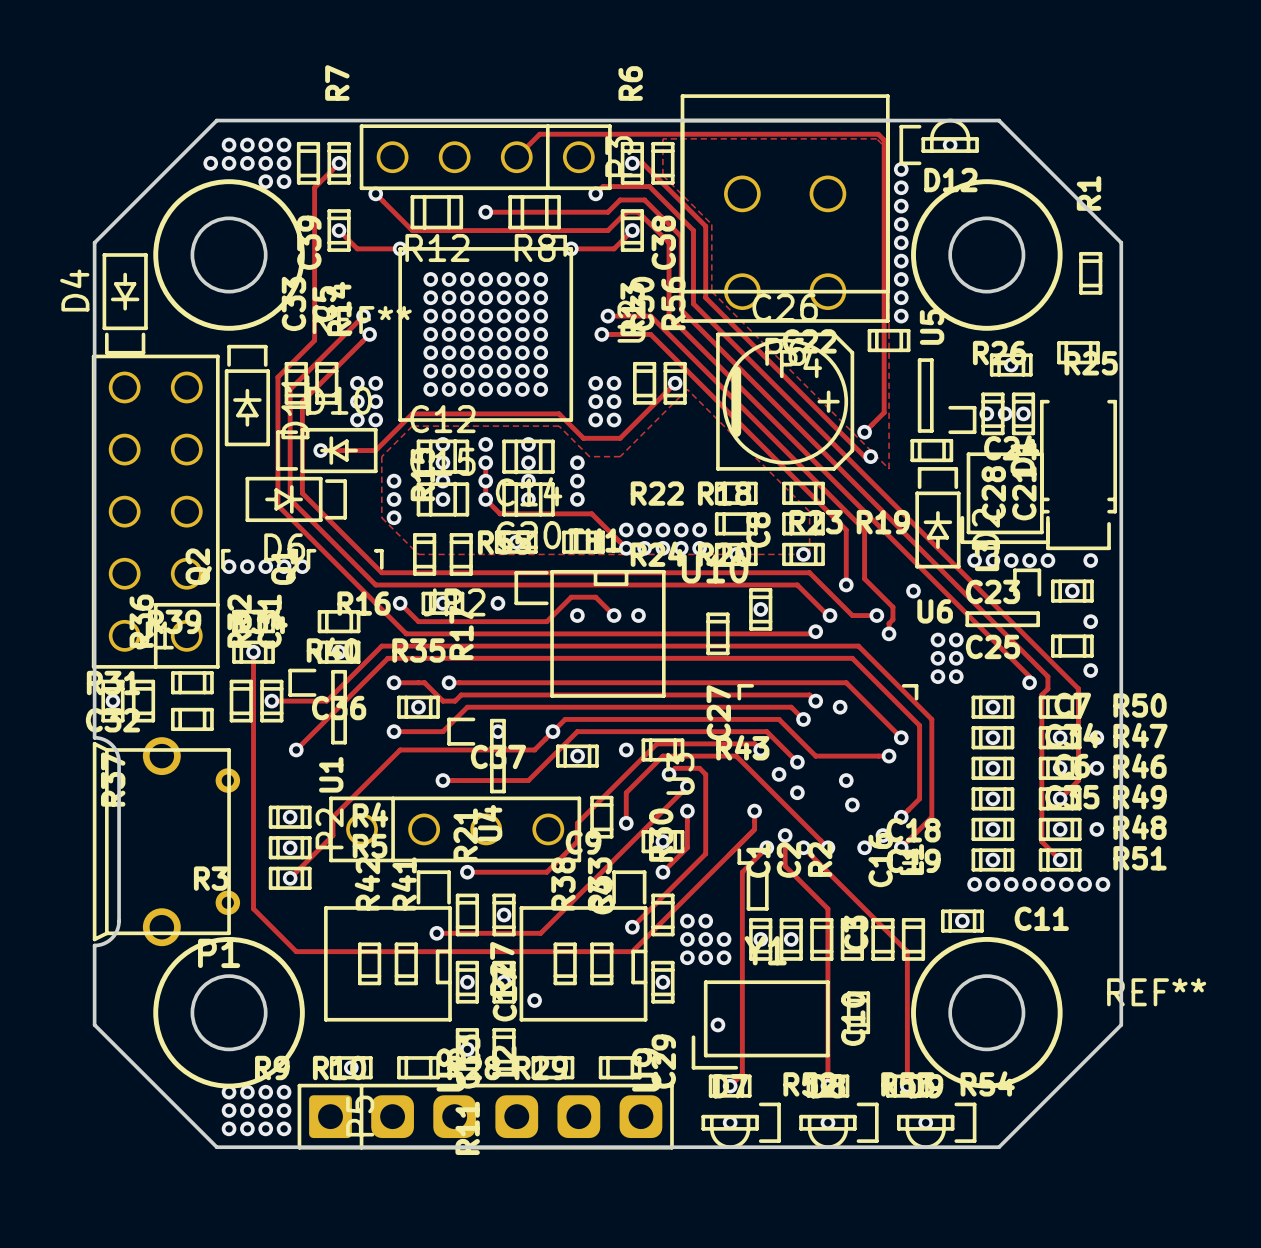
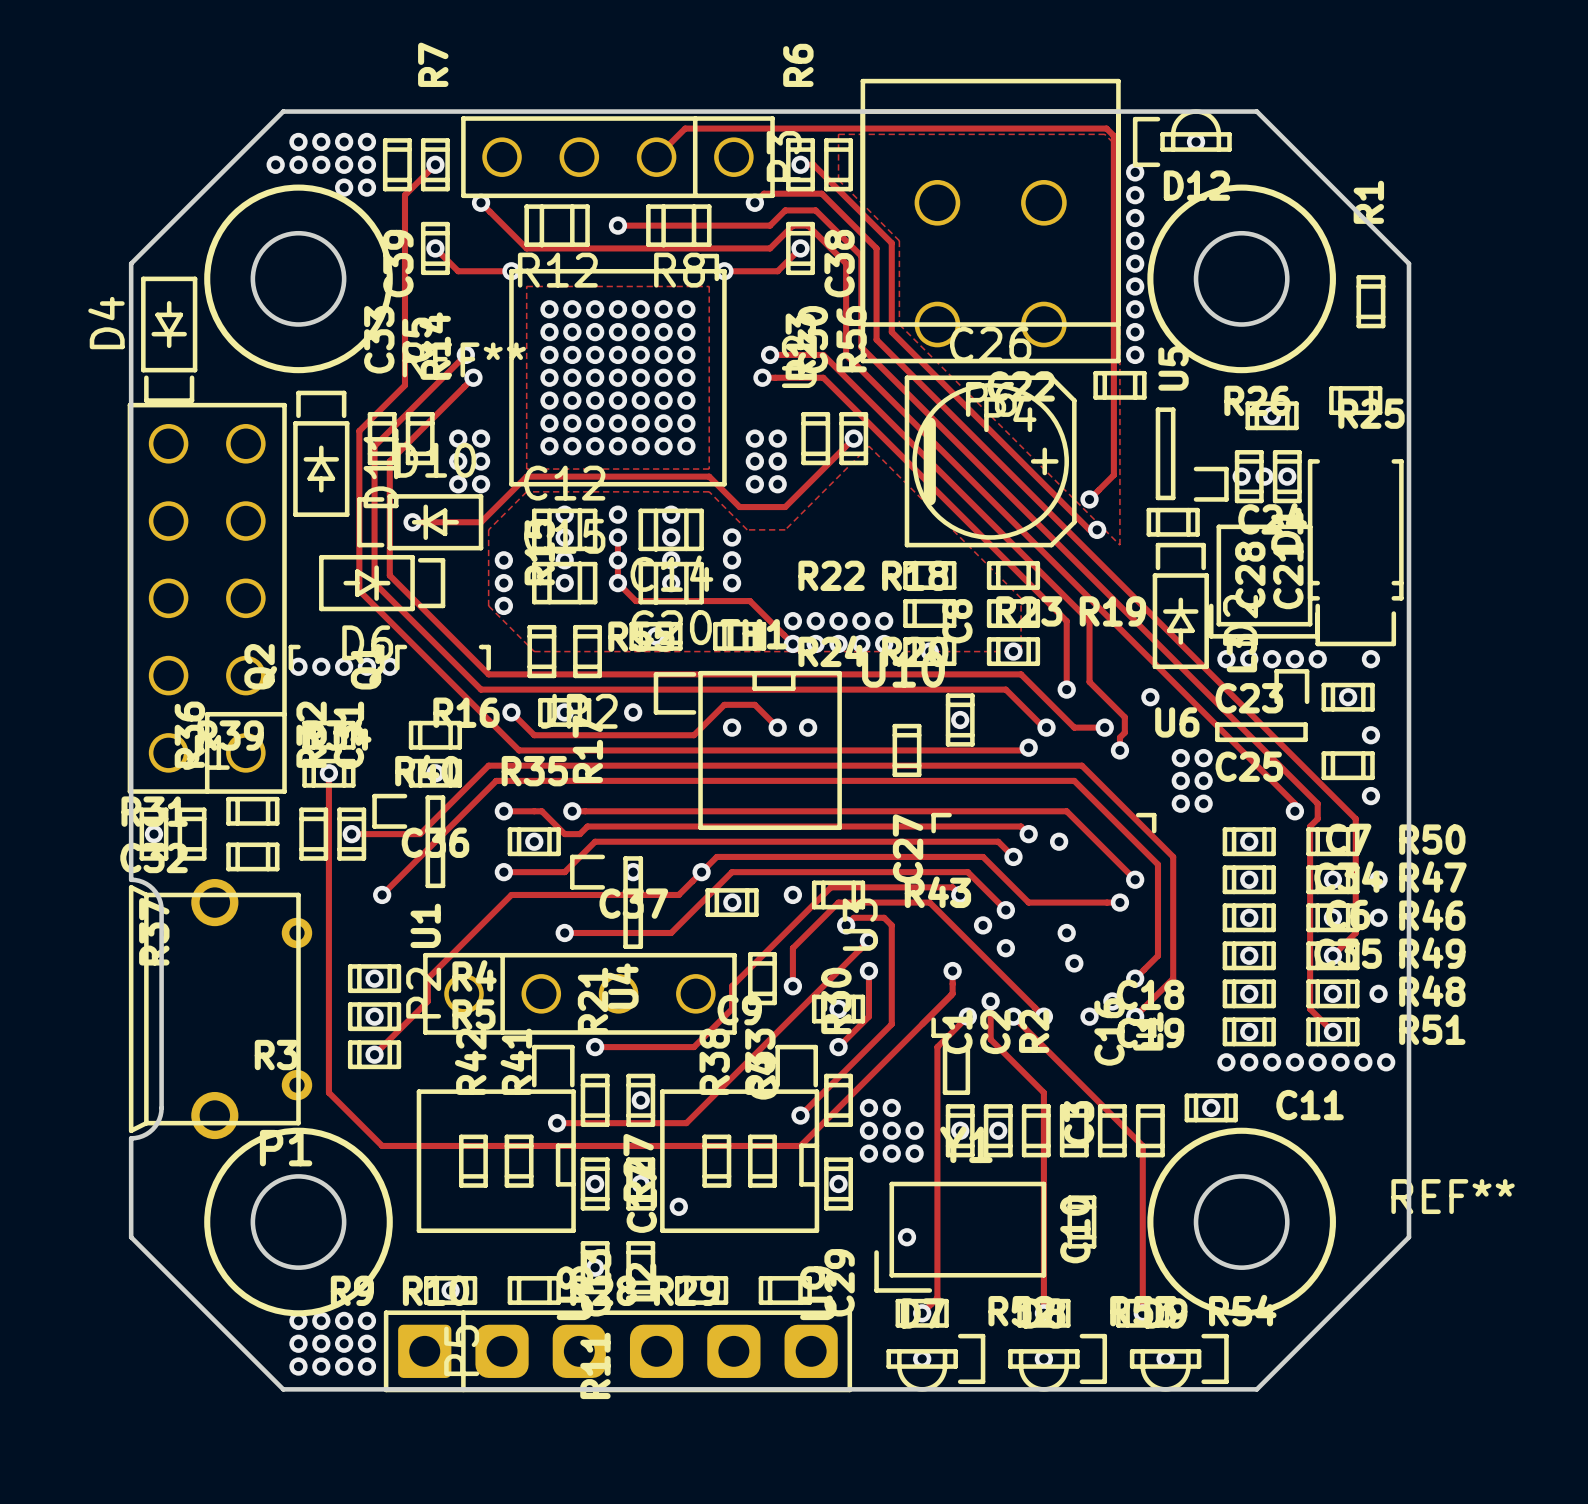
zone outline: none -> (526, 286) (709, 286) (709, 469) (526, 469) (526, 286)

